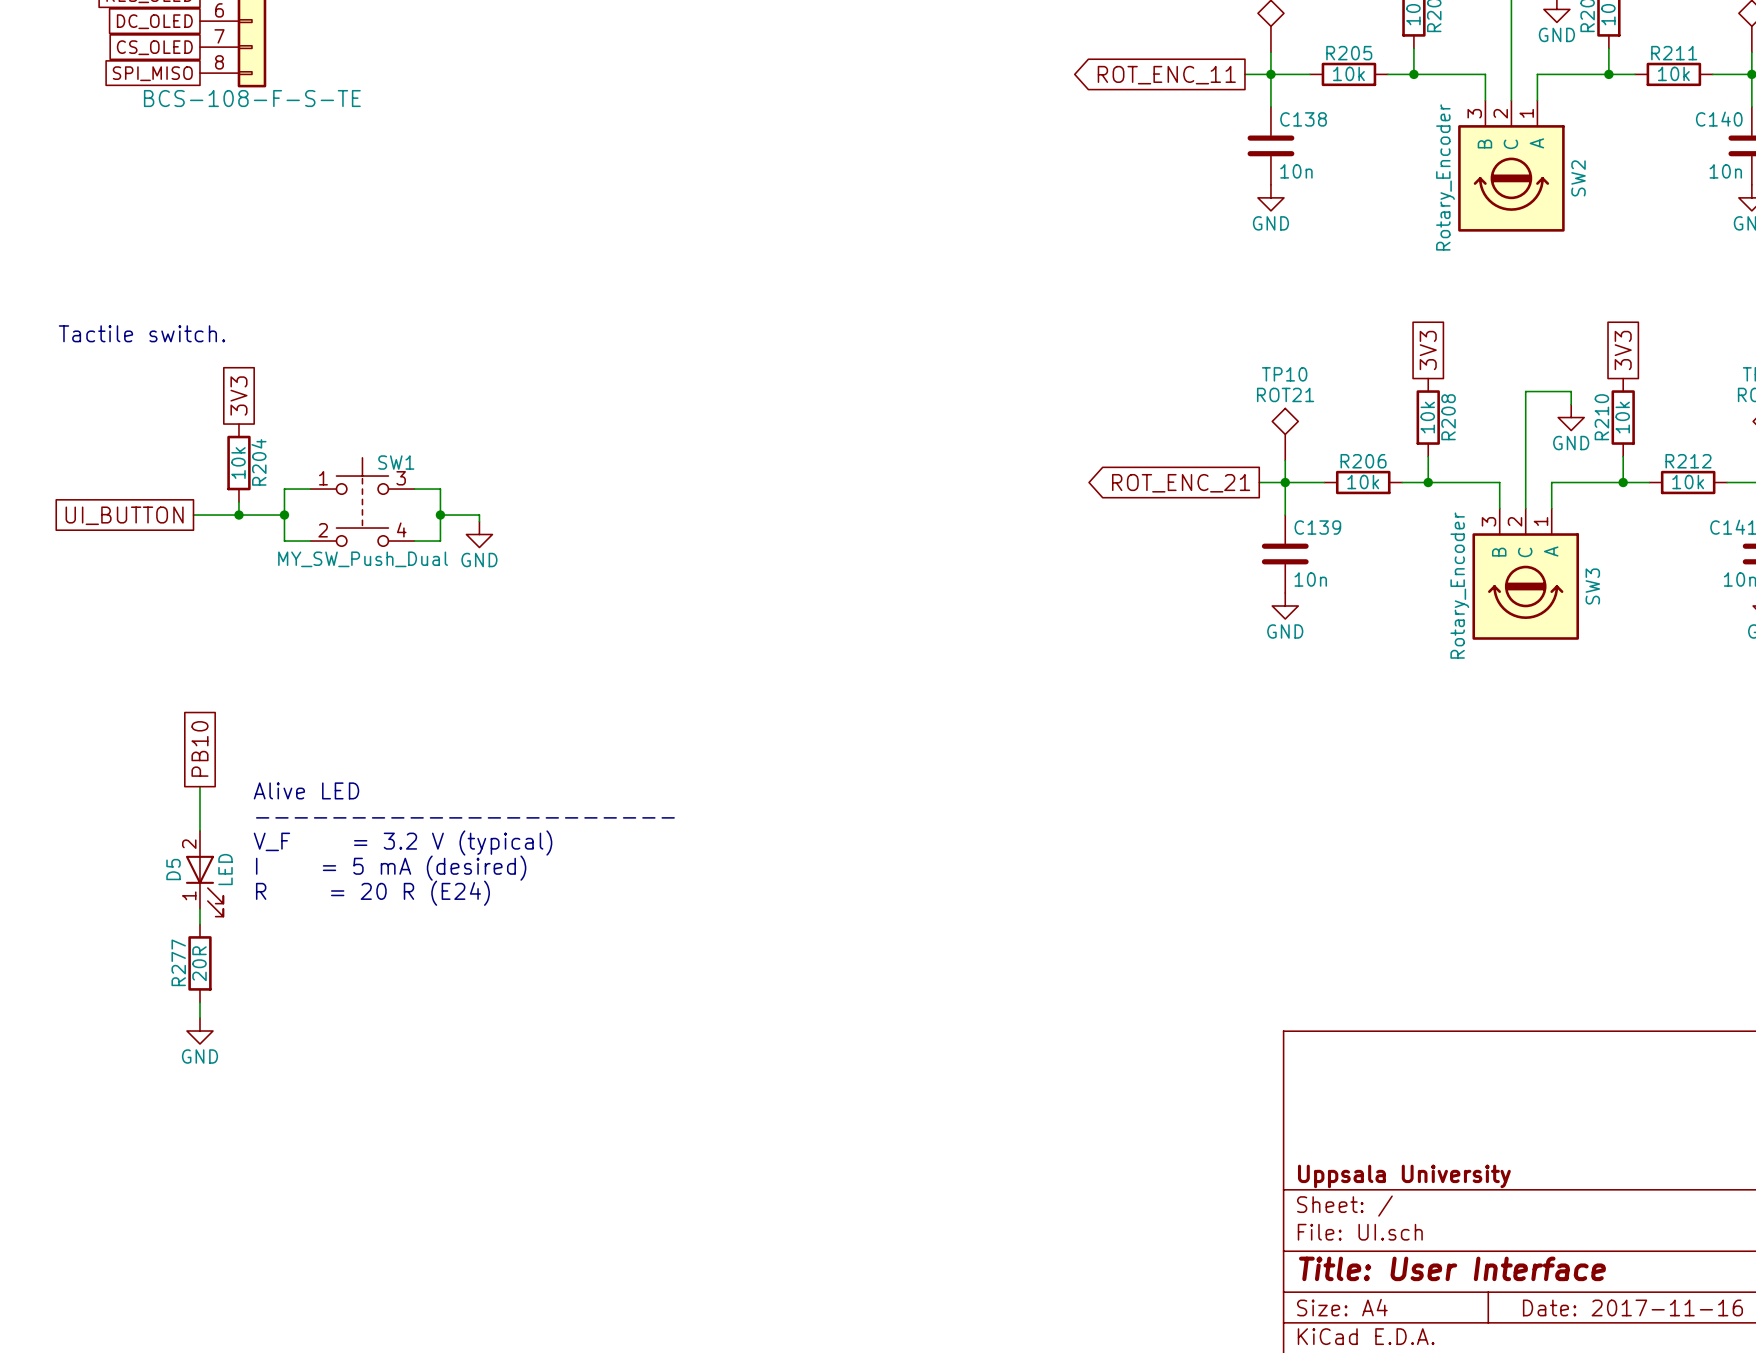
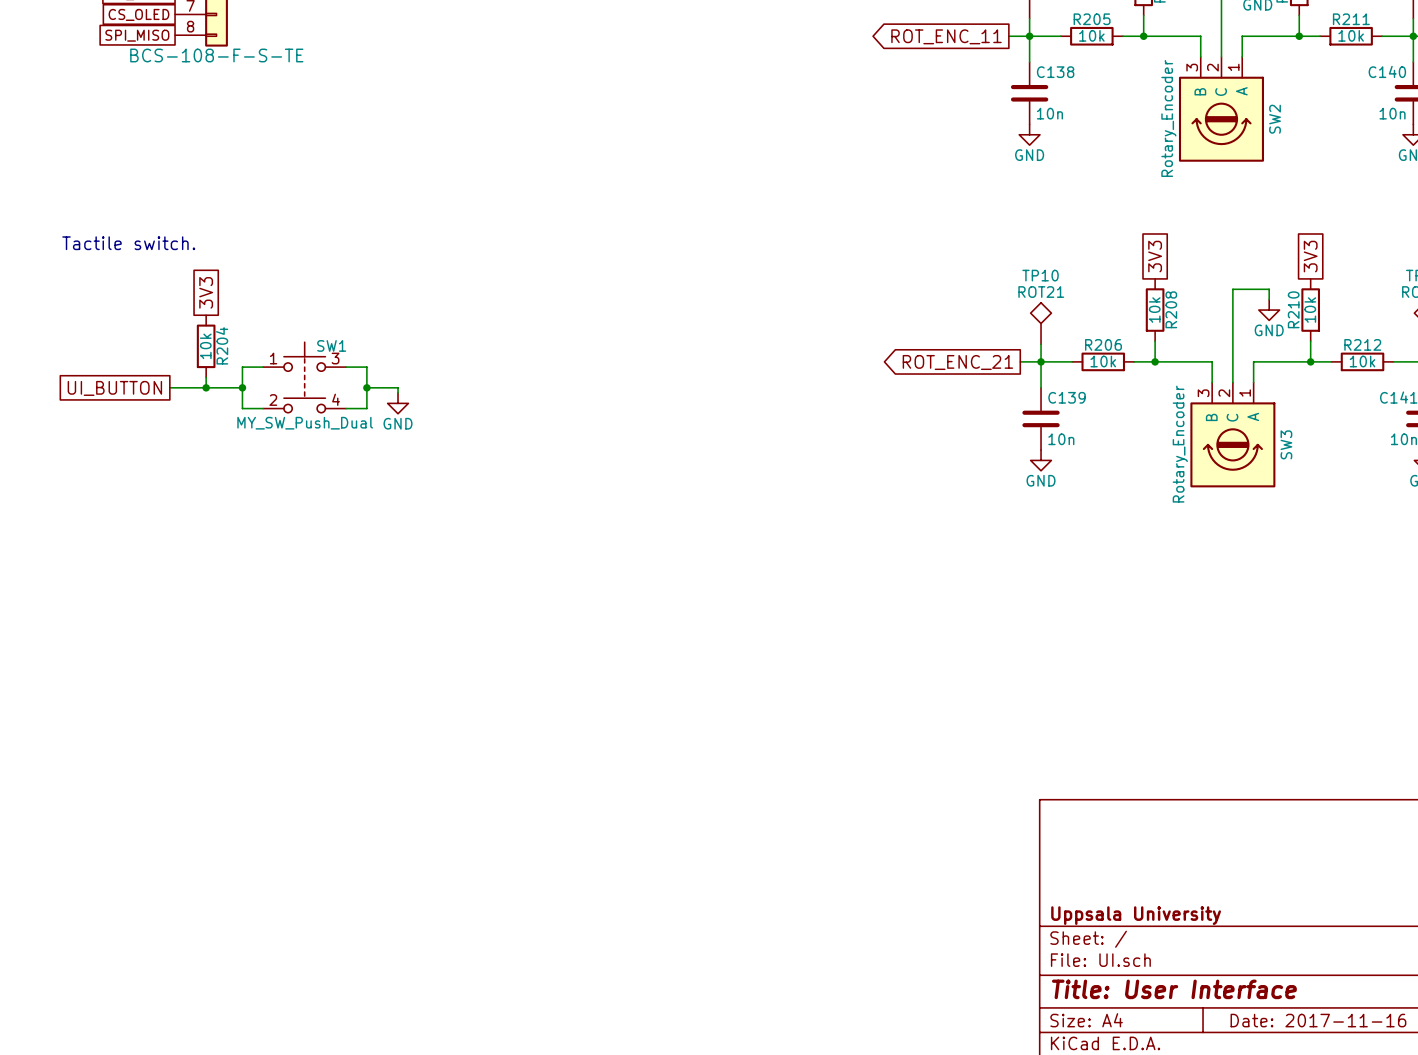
global label: PB10 (199, 748) -> none
wire: (199, 786) (199, 830) -> none
text: Alive LED (306, 790) -> none
text: ---------------------- (465, 817) -> none
text: V_F = 3.2 V (typical) (403, 843) -> none
text: I = 5 mA (desired) (391, 868) -> none
D5: LED (204, 873) -> none
text: R = 20 R (E24) (372, 893) -> none
wire: (199, 908) (199, 924) -> none
R277: 20R (199, 963) -> none
wire: (199, 1002) (199, 1018) -> none
power symbol: GND (199, 1031) -> none

